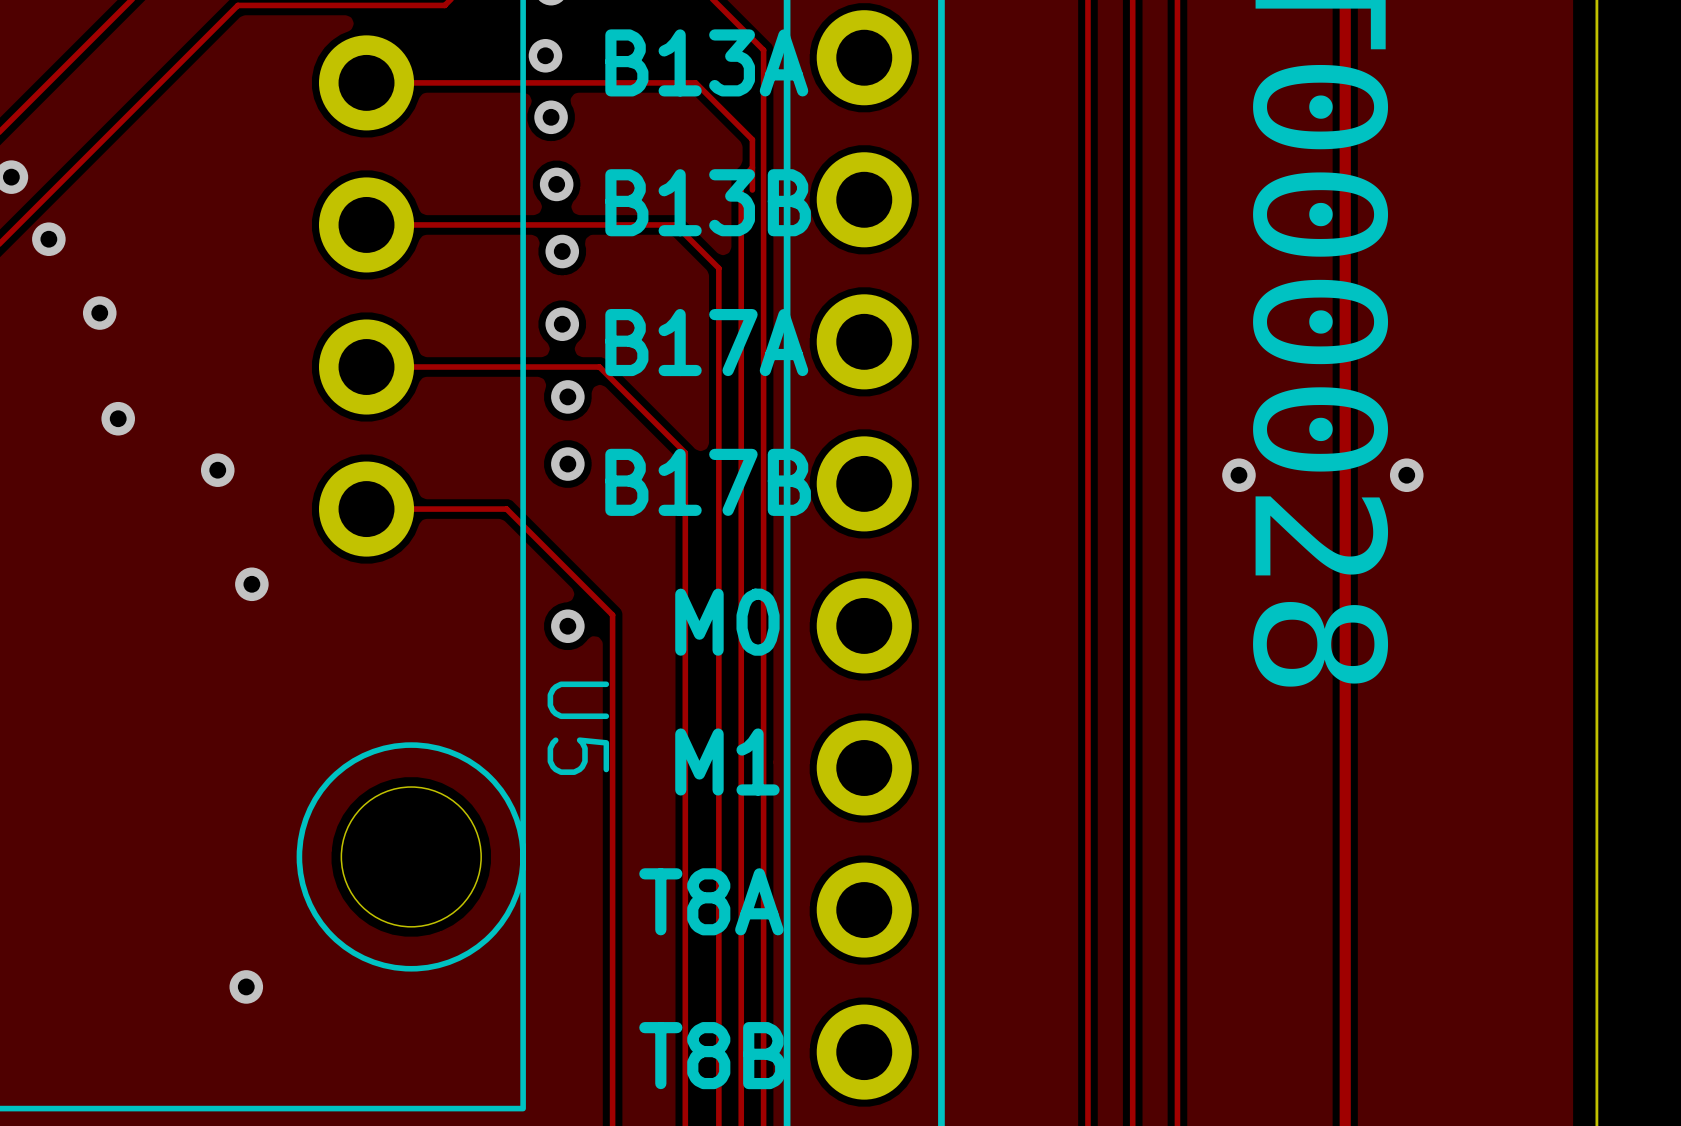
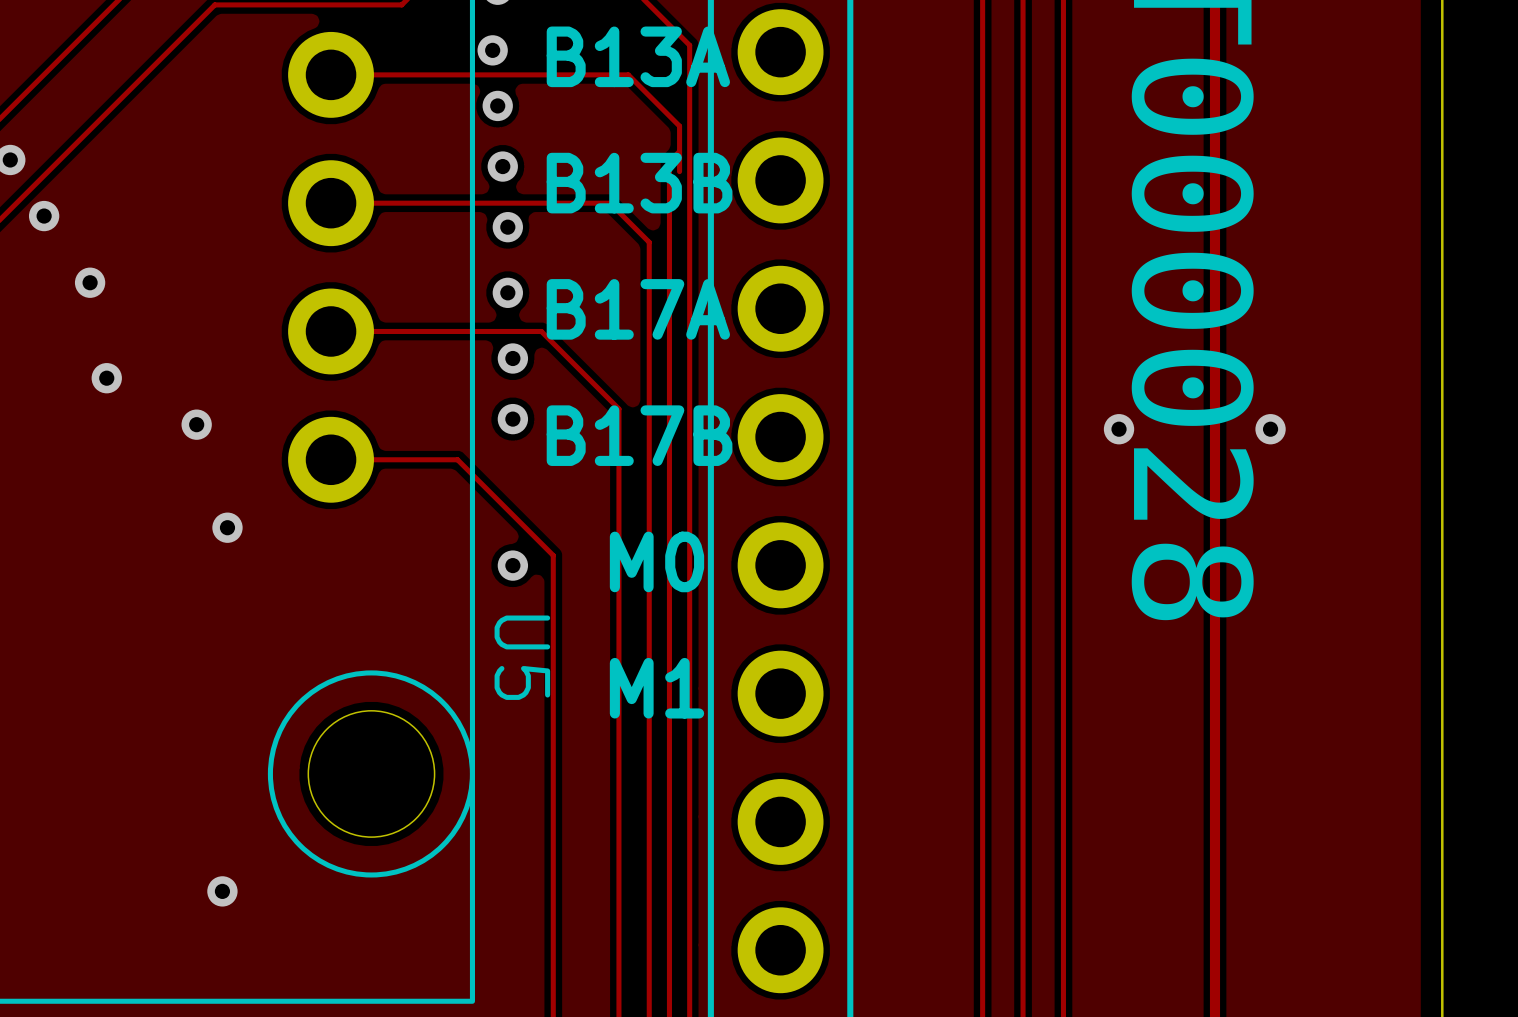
text: T8A (711, 901) -> none
text: T8B (712, 1055) -> none

